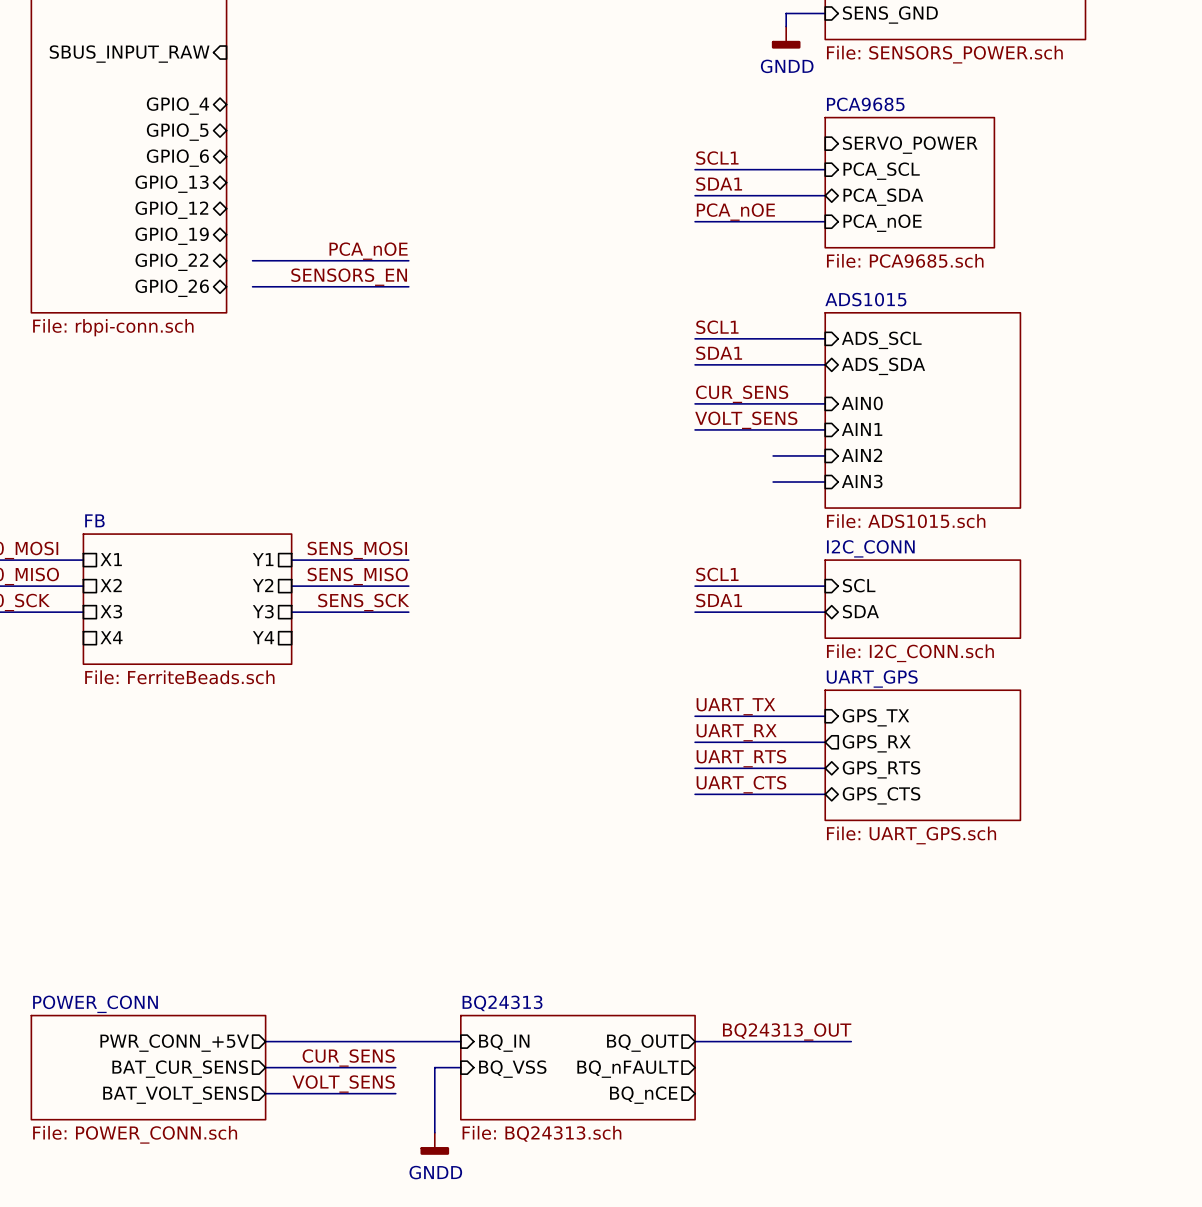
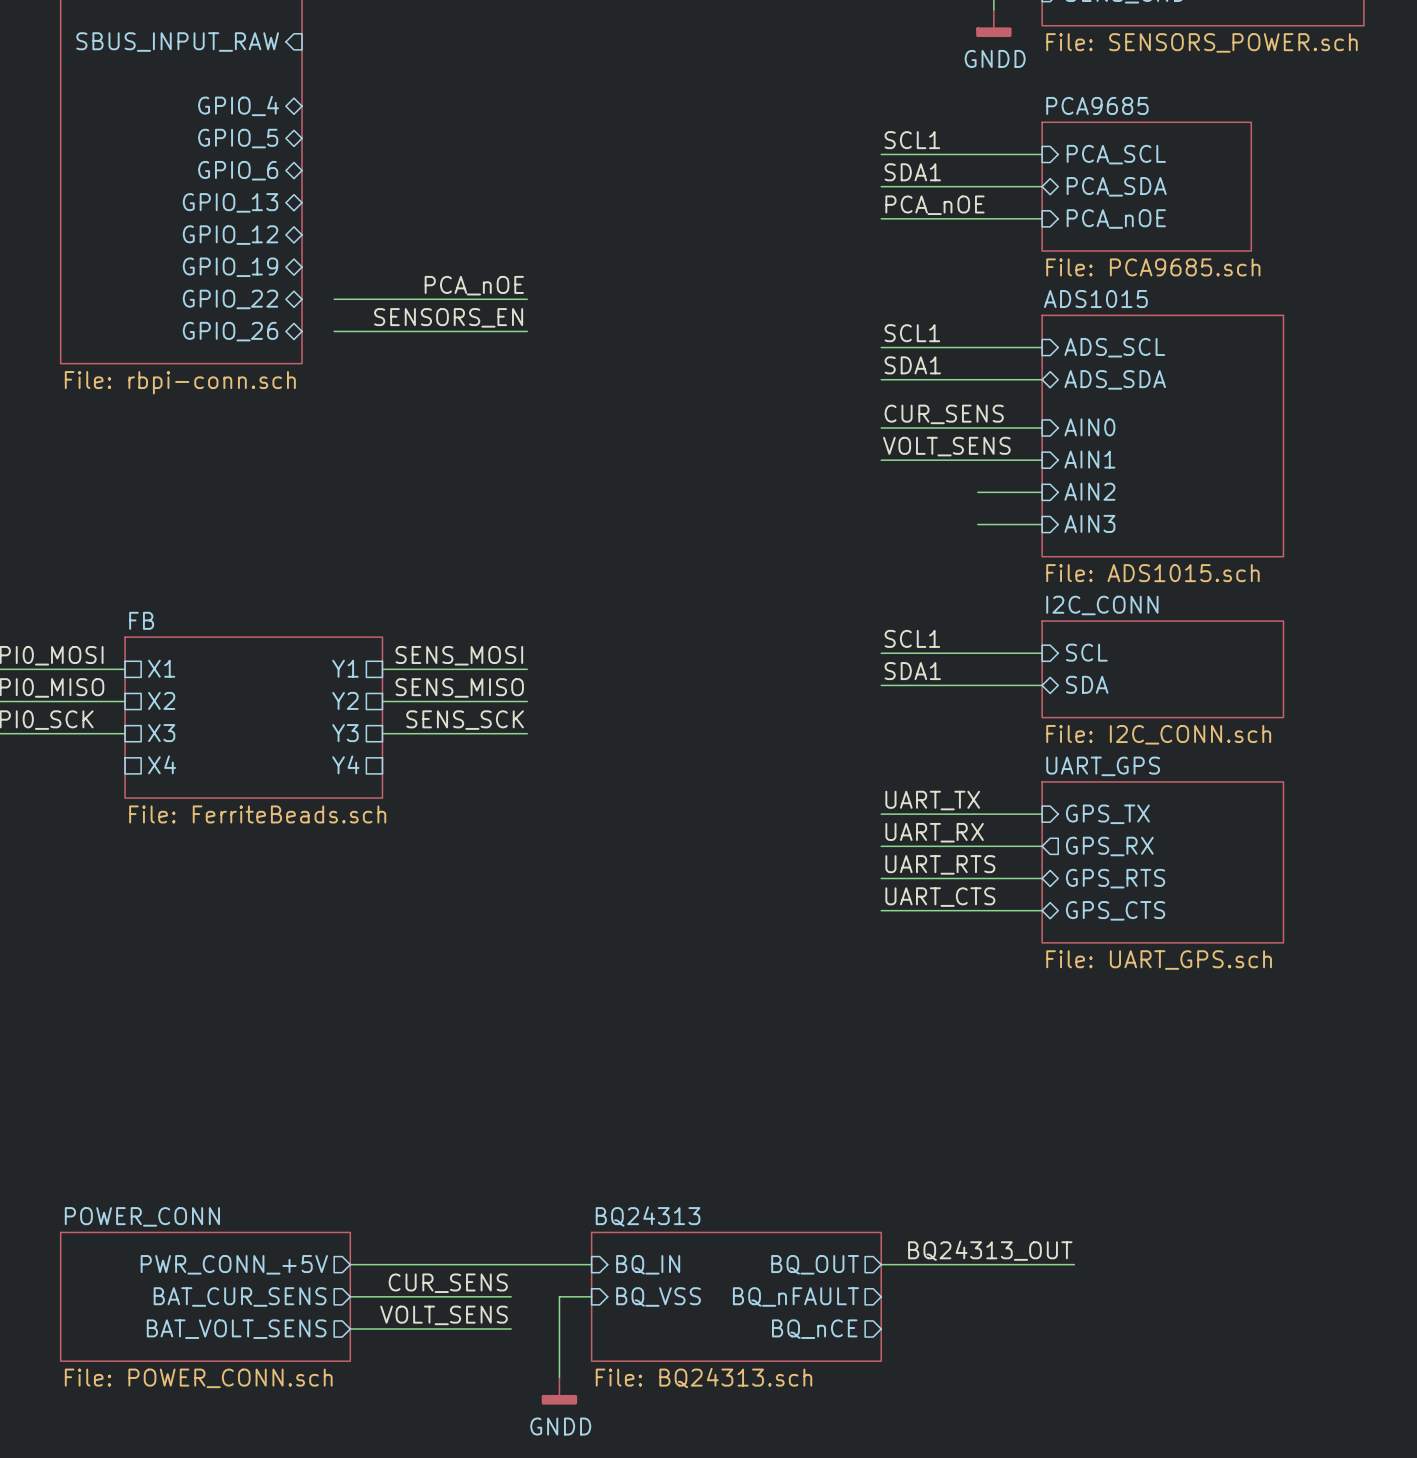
sheet PCA9685 shape: [825, 117, 995, 248] -> [1042, 122, 1252, 252]
label: none -> SCL1 (912, 140)
sheet pin: SERVO_POWER (910, 145) -> PCA_SCL (1116, 154)
label: SCL1 (717, 158) -> SDA1 (912, 172)
sheet pin shape: input (881, 171) -> bidirectional (1116, 186)
sheet pin: PCA_SCL (881, 171) -> PCA_SDA (1116, 186)
label: SDA1 (719, 184) -> PCA_nOE (934, 205)
sheet pin shape: bidirectional (883, 197) -> input (1116, 218)
sheet pin: PCA_SDA (883, 197) -> PCA_nOE (1116, 218)
label: PCA_nOE (735, 212) -> none
wire: (695, 221) (825, 221) -> (881, 154) (1042, 154)
sheet pin: PCA_nOE (882, 223) -> none
label: none -> SDA1 (912, 365)
label position: SCL1 (717, 327) -> SCL1 (912, 333)
sheet pin: none -> ADS_SDA (1115, 379)
wire: (695, 338) (825, 338) -> (881, 347) (1042, 347)
sheet pin position: ADS_SCL (881, 340) -> ADS_SCL (1114, 347)
label: SDA1 (719, 353) -> CUR_SENS (944, 414)
sheet pin shape: bidirectional (883, 366) -> input (1089, 427)
sheet pin: ADS_SDA (883, 366) -> AIN0 (1089, 427)
label: CUR_SENS (742, 394) -> none
wire: (695, 403) (825, 403) -> (881, 379) (1042, 379)
sheet pin: AIN0 (862, 403) -> none
sheet ADS1015 position: (922, 410) -> (1162, 436)
label position: VOLT_SENS (746, 420) -> VOLT_SENS (946, 446)
wire: (695, 429) (825, 429) -> (881, 460) (1042, 460)
sheet pin position: AIN1 (862, 429) -> AIN1 (1089, 459)
wire: (773, 455) (825, 455) -> (977, 492) (1042, 492)
sheet pin position: AIN2 (862, 455) -> AIN2 (1089, 491)
sheet pin position: AIN3 (862, 481) -> AIN3 (1089, 523)
wire: (773, 482) (825, 482) -> (977, 524) (1042, 524)
label position: SCL1 (717, 574) -> SCL1 (912, 638)
sheet pin position: SCL (859, 585) -> SCL (1086, 652)
wire: (695, 586) (825, 586) -> (881, 653) (1042, 653)
sheet I2C_CONN position: (922, 599) -> (1162, 669)
label position: SDA1 (719, 600) -> SDA1 (912, 671)
sheet pin position: SDA (860, 611) -> SDA (1087, 684)
wire: (695, 612) (825, 612) -> (881, 685) (1042, 685)
label position: UART_TX (735, 706) -> UART_TX (932, 800)
wire: (695, 716) (825, 716) -> (881, 814) (1042, 814)
sheet pin position: GPS_TX (875, 717) -> GPS_TX (1107, 814)
label position: UART_RX (736, 732) -> UART_RX (934, 832)
wire: (695, 742) (825, 742) -> (881, 846) (1042, 846)
sheet pin position: GPS_RX (876, 743) -> GPS_RX (1109, 846)
sheet UART_GPS position: (922, 755) -> (1162, 862)
label position: UART_RTS (741, 758) -> UART_RTS (940, 864)
wire: (695, 768) (825, 768) -> (881, 878) (1042, 878)
sheet pin position: GPS_RTS (881, 769) -> GPS_RTS (1115, 878)
label position: UART_CTS (741, 784) -> UART_CTS (940, 897)
wire: (695, 794) (825, 794) -> (881, 910) (1042, 910)
sheet pin position: GPS_CTS (881, 795) -> GPS_CTS (1115, 910)

